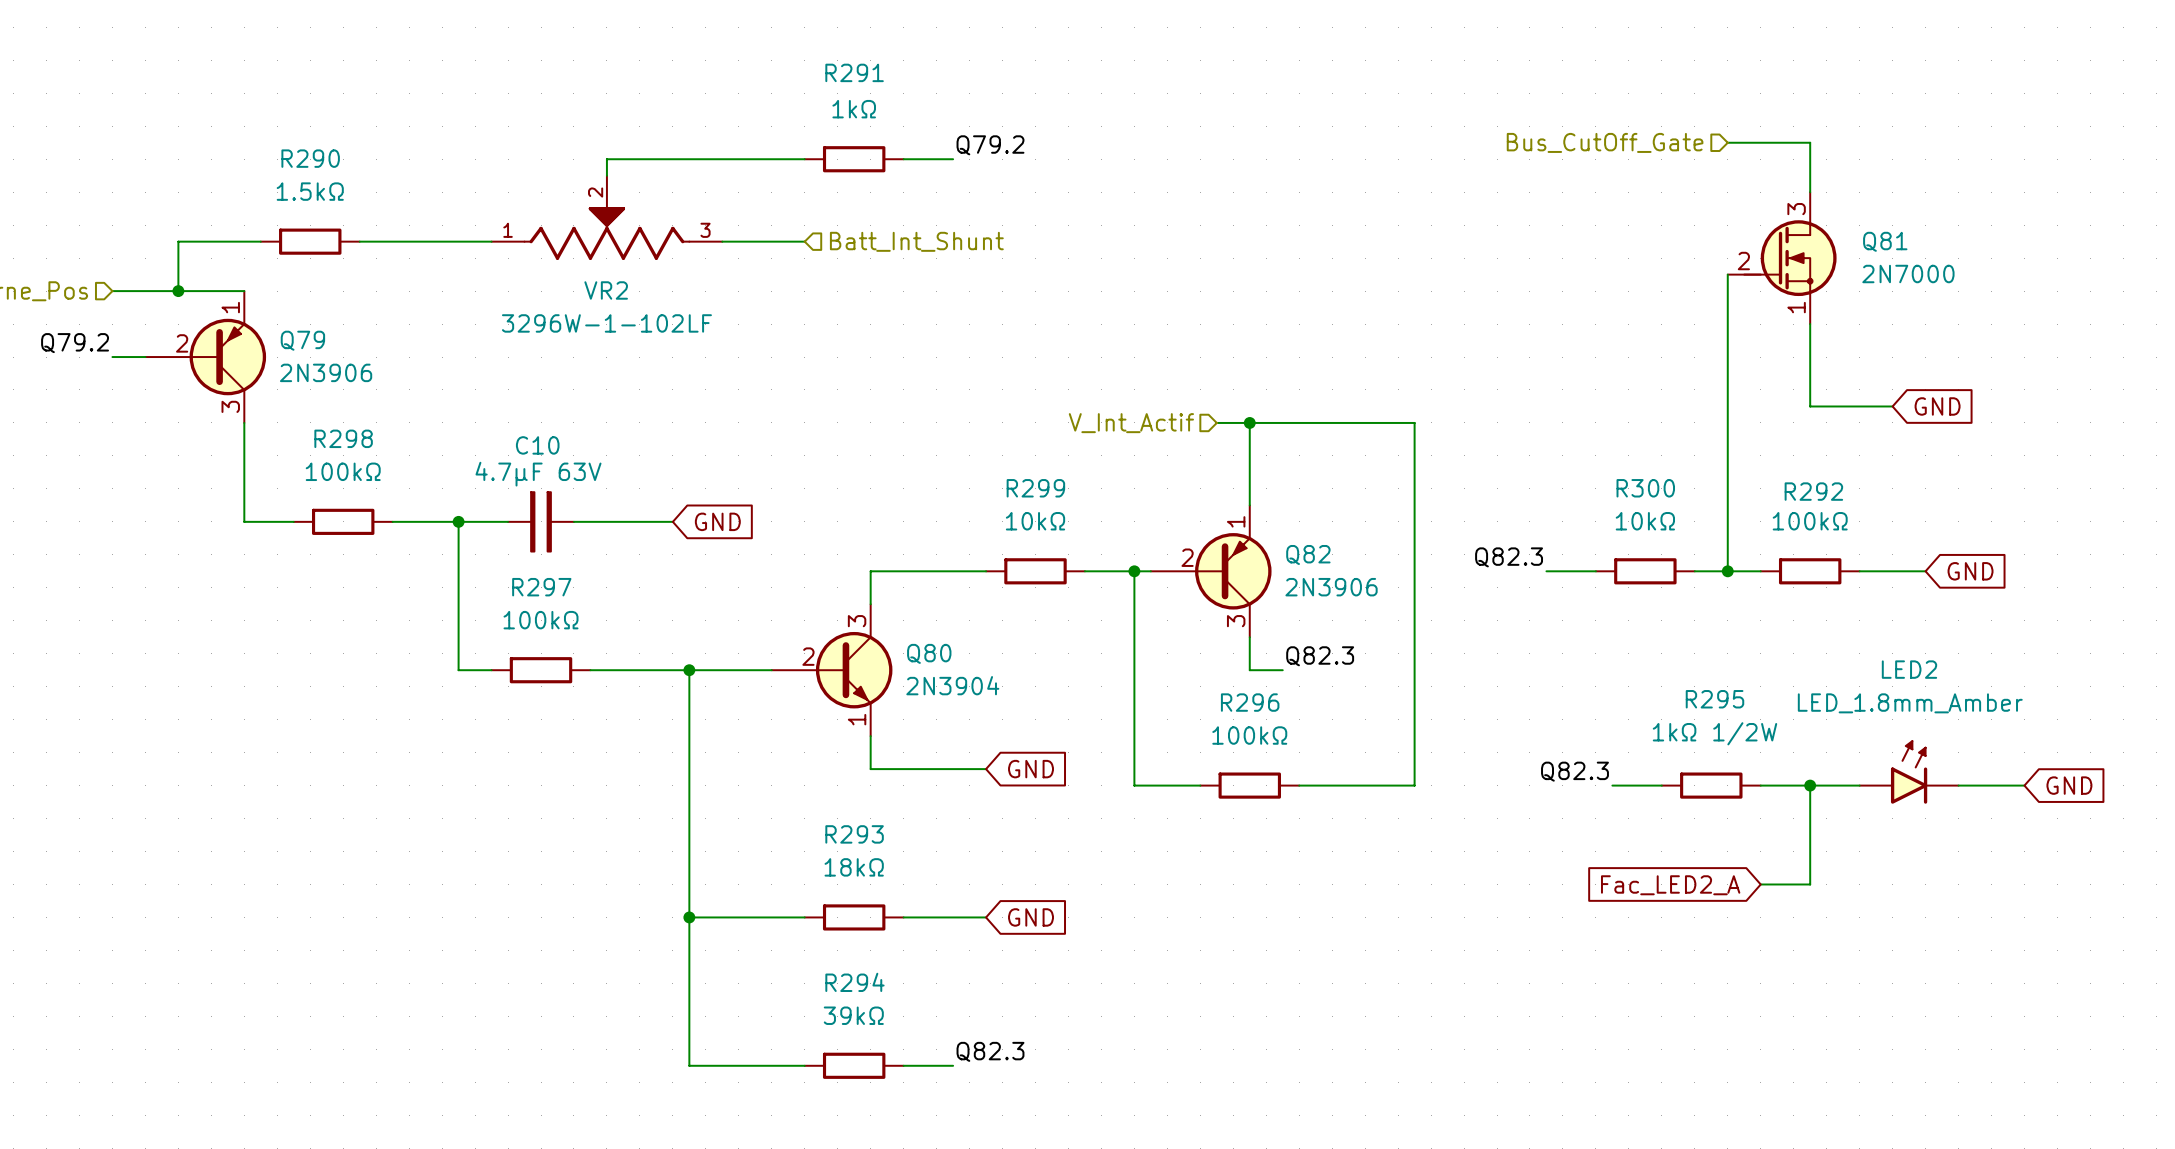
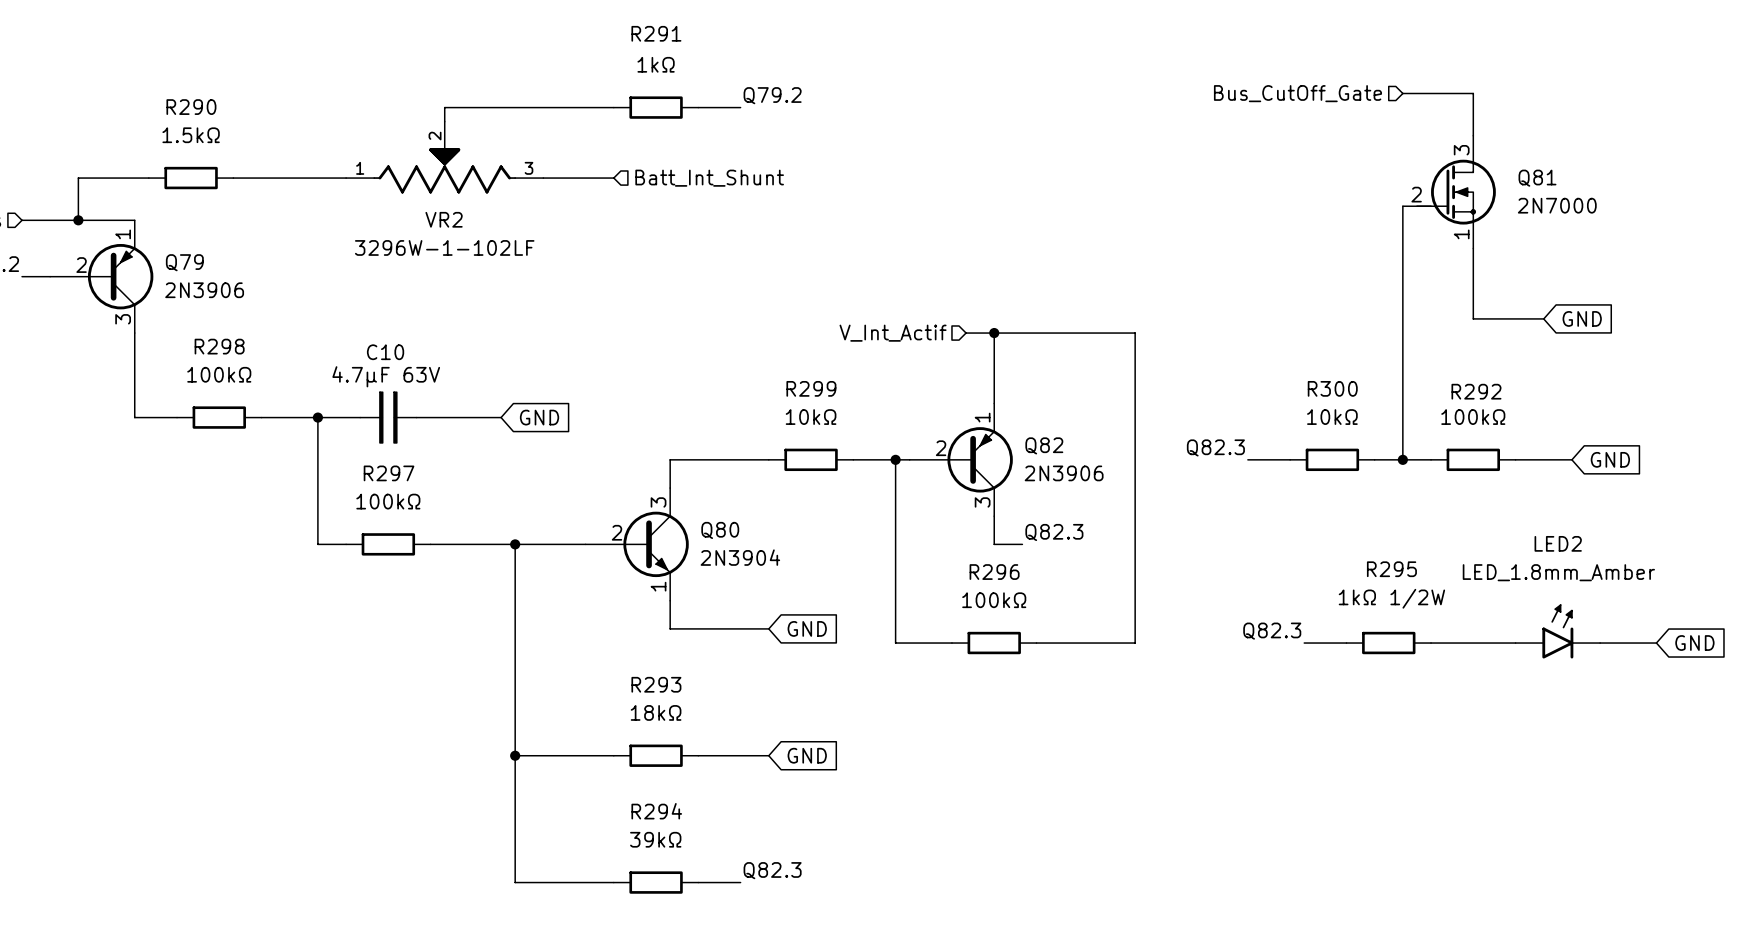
wire: (1810, 785) (1810, 884) (1760, 884) -> none
junction: (1810, 785) -> none
global label: Fac_LED2_A (1670, 885) -> none

